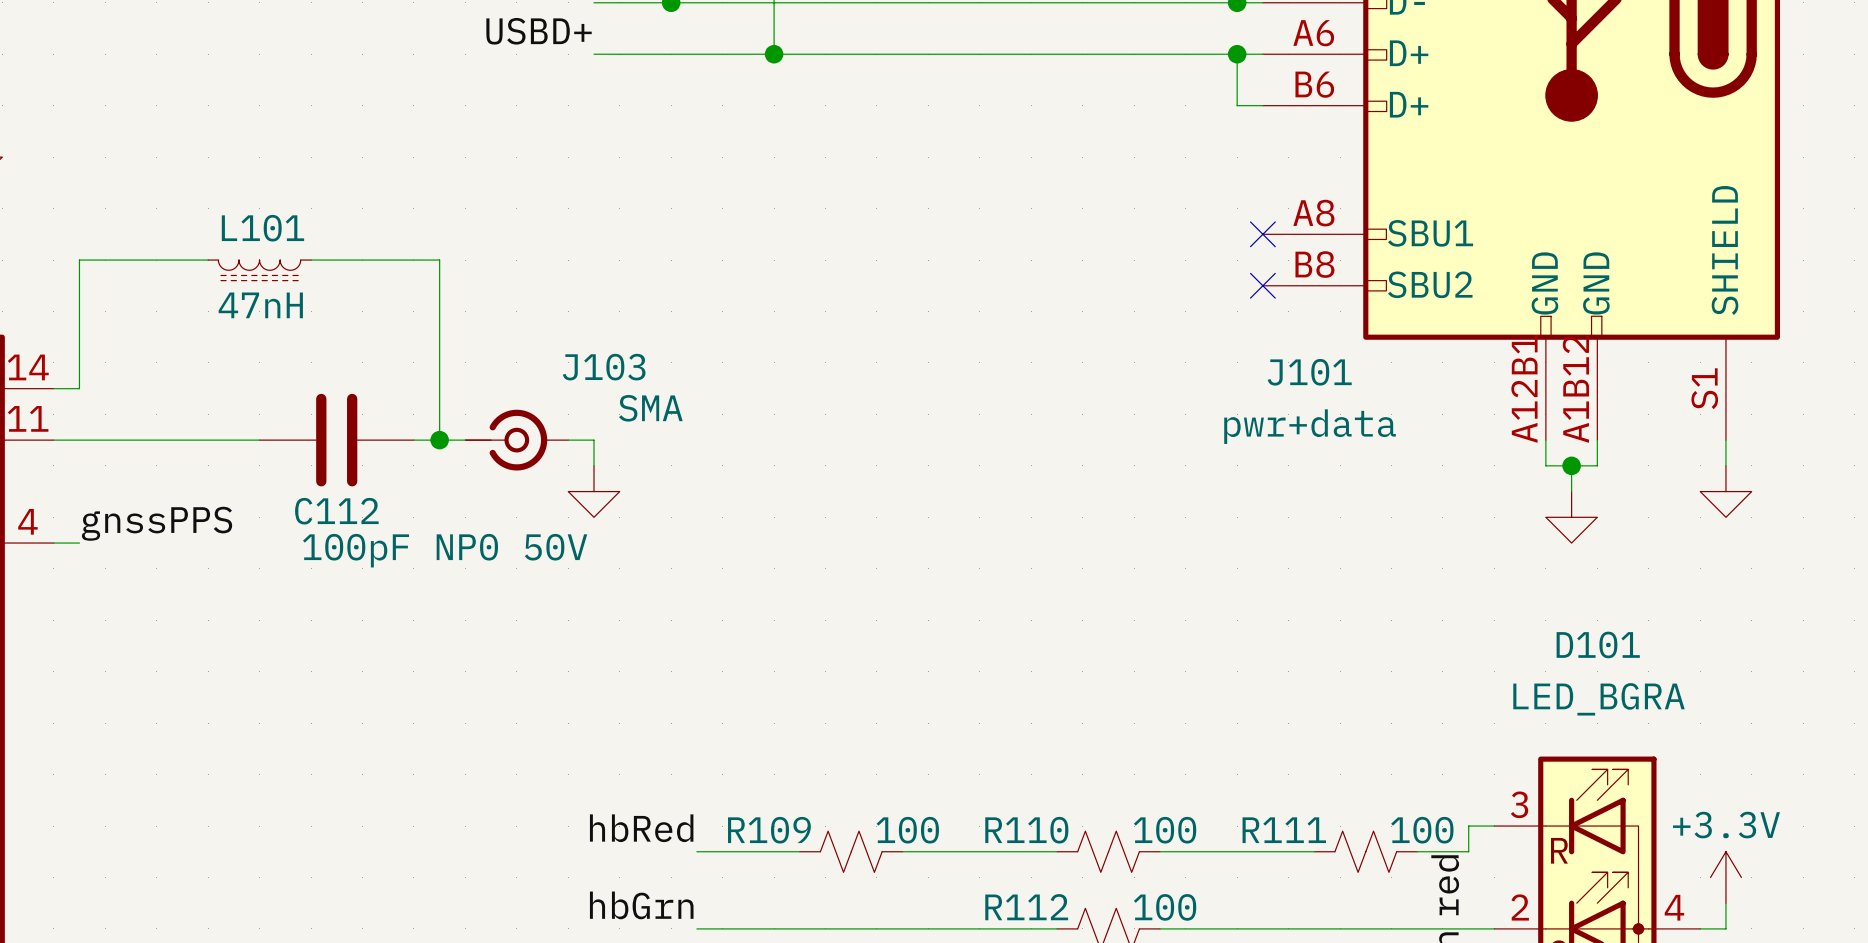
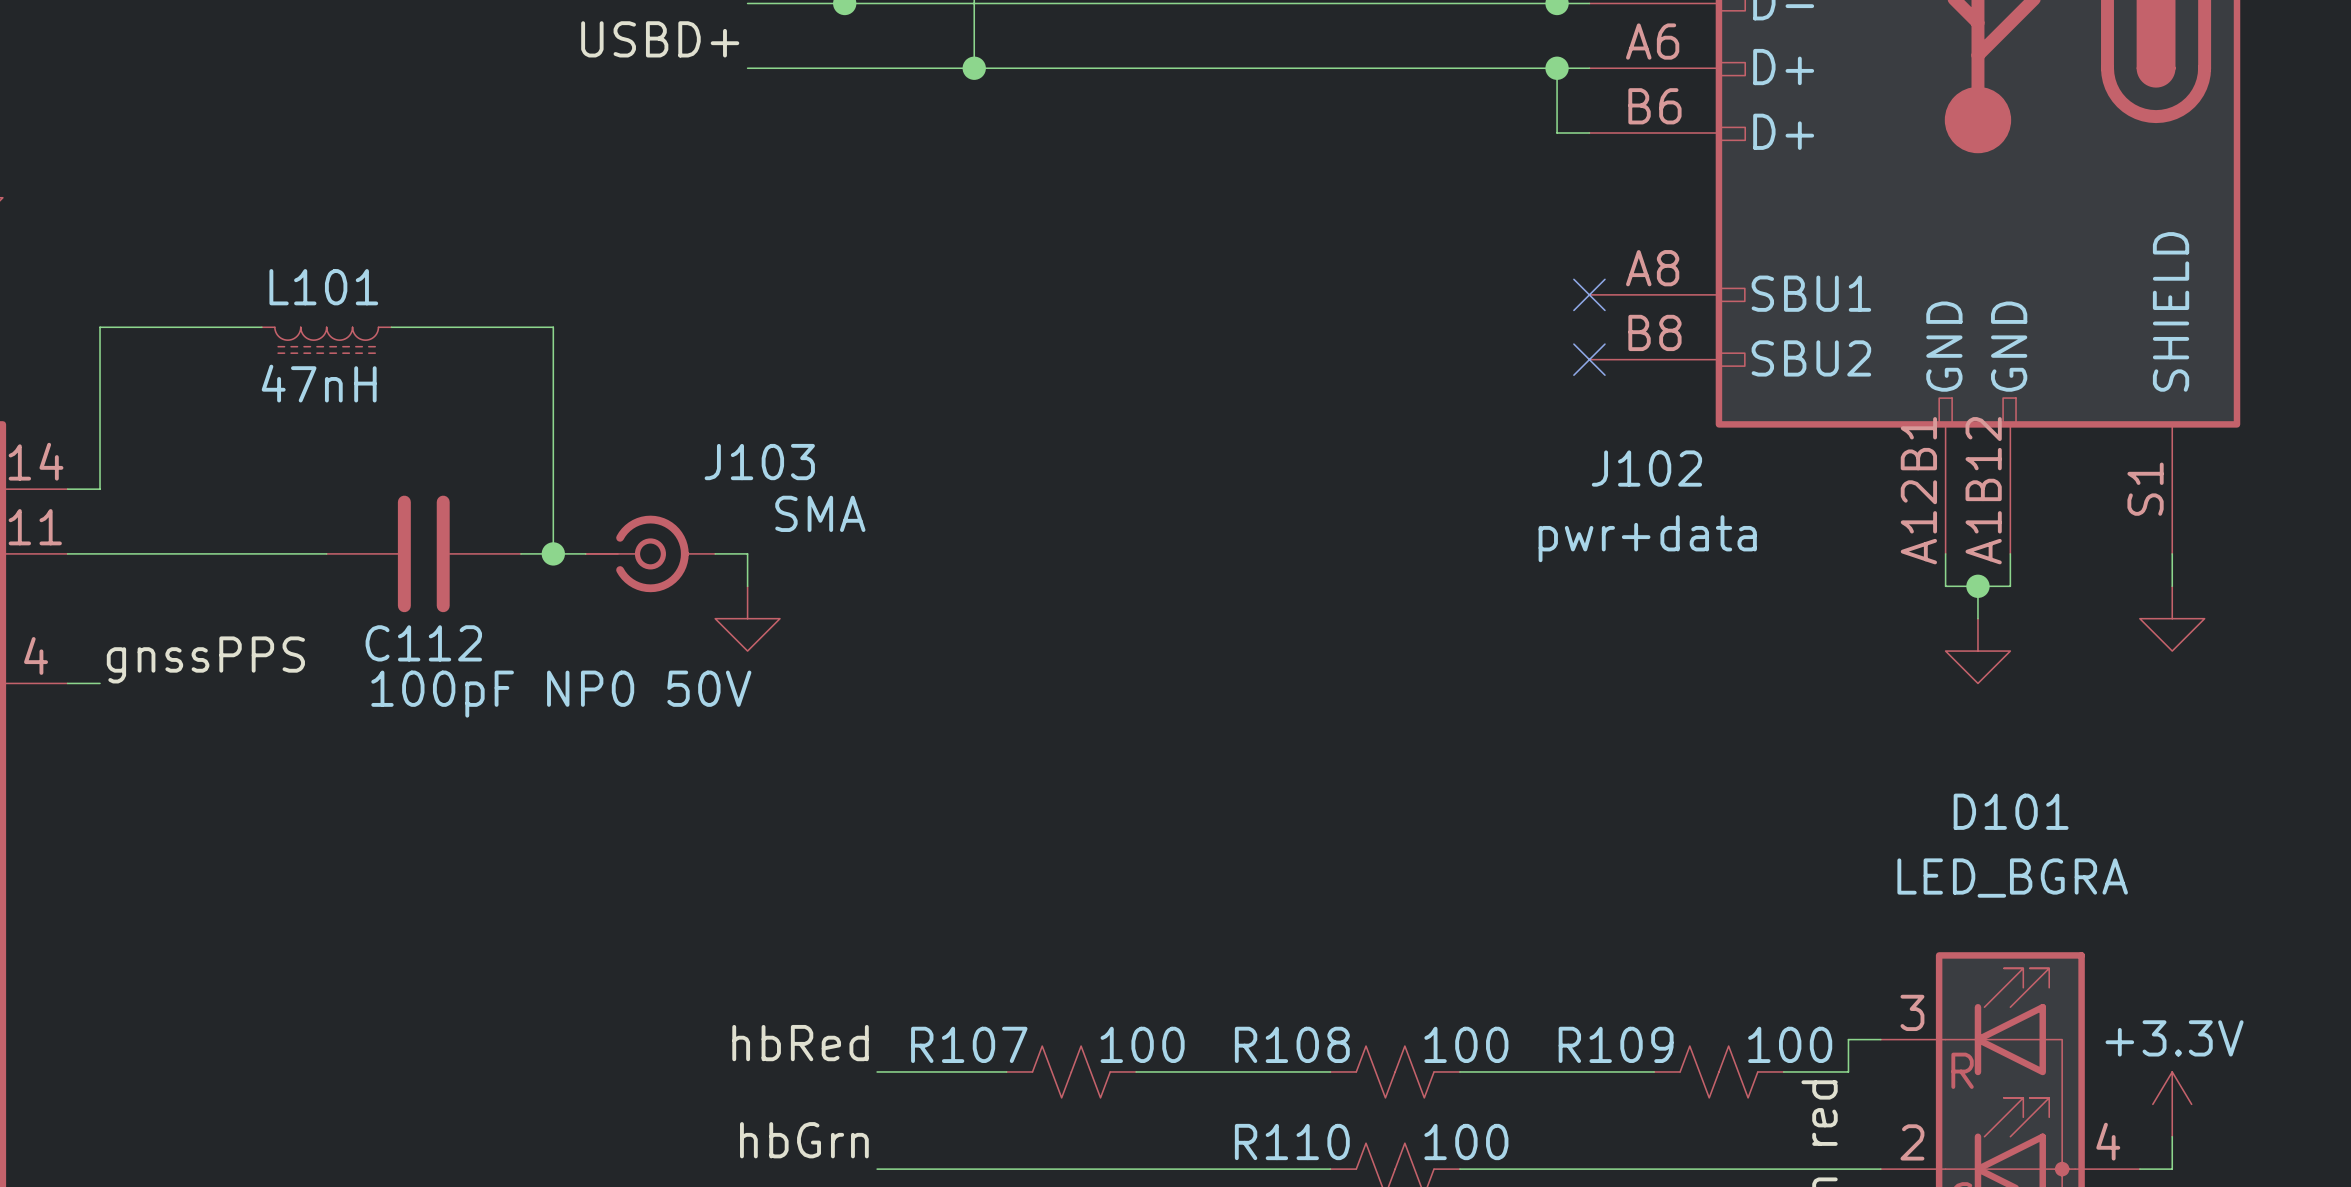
J101 name: J101 (1309, 372) -> J102 (1646, 468)
R109 name: R109 (769, 830) -> R107 (969, 1044)
R110 name: R110 (1026, 830) -> R108 (1292, 1044)
R111 name: R111 (1284, 830) -> R109 (1616, 1044)
R112 name: R112 (1026, 907) -> R110 (1292, 1142)

